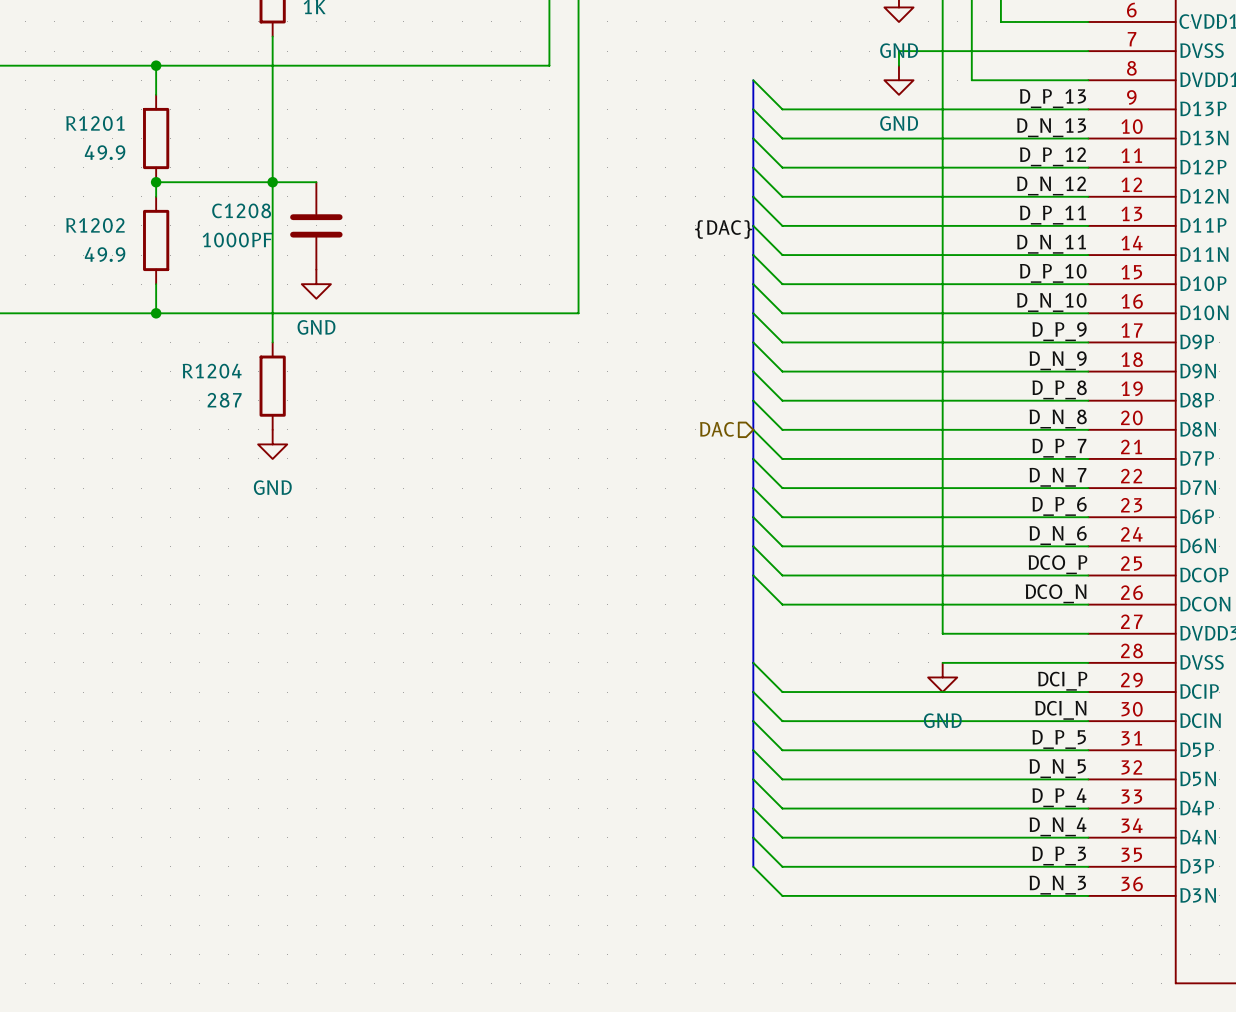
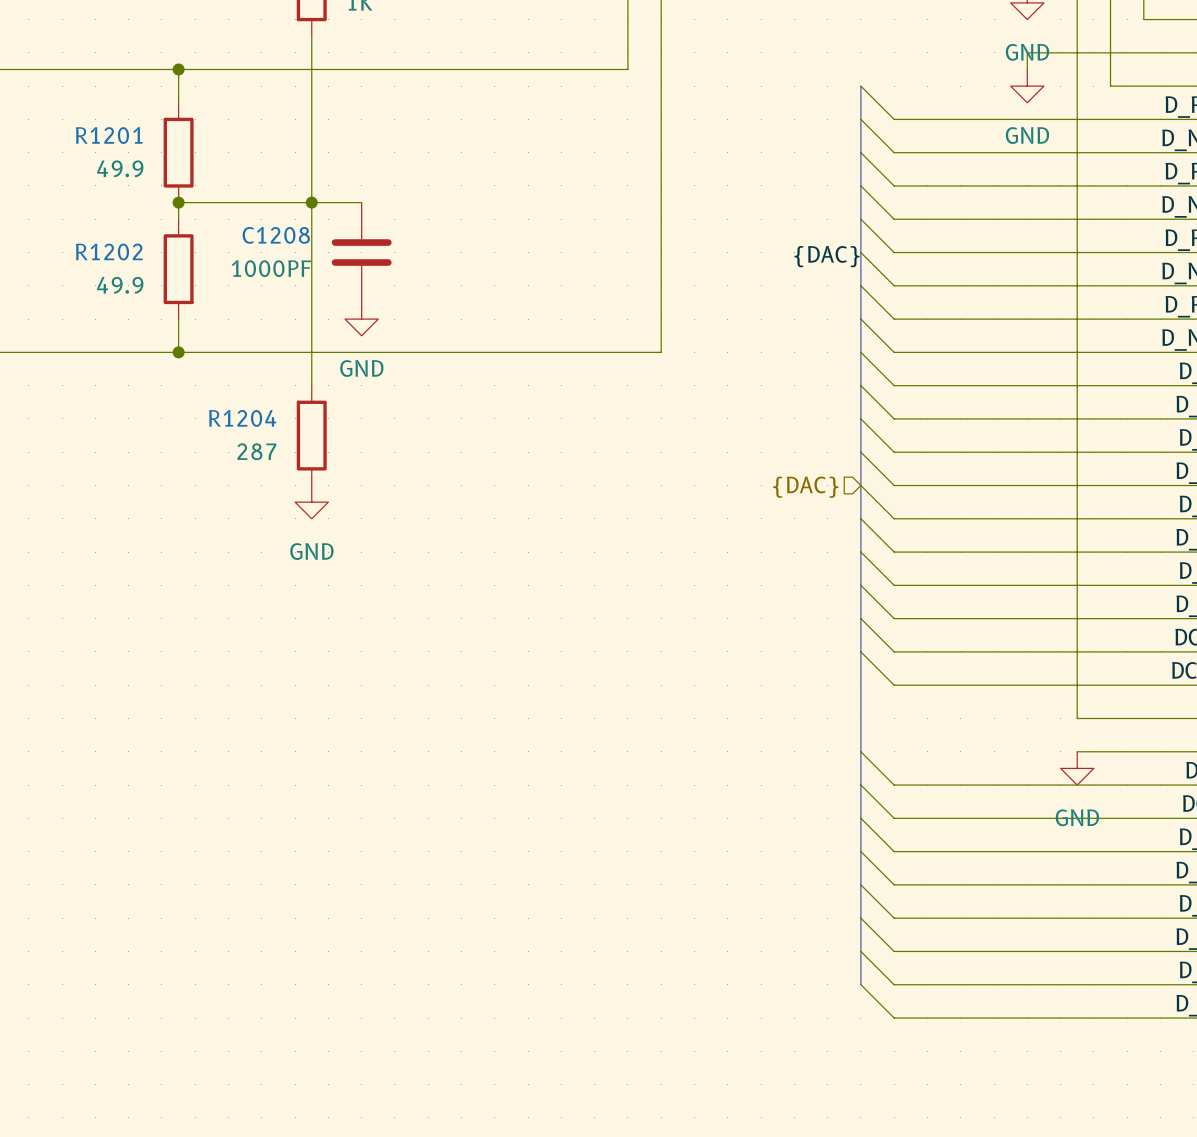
hierarchical label: DAC (717, 429) -> {DAC} (805, 487)

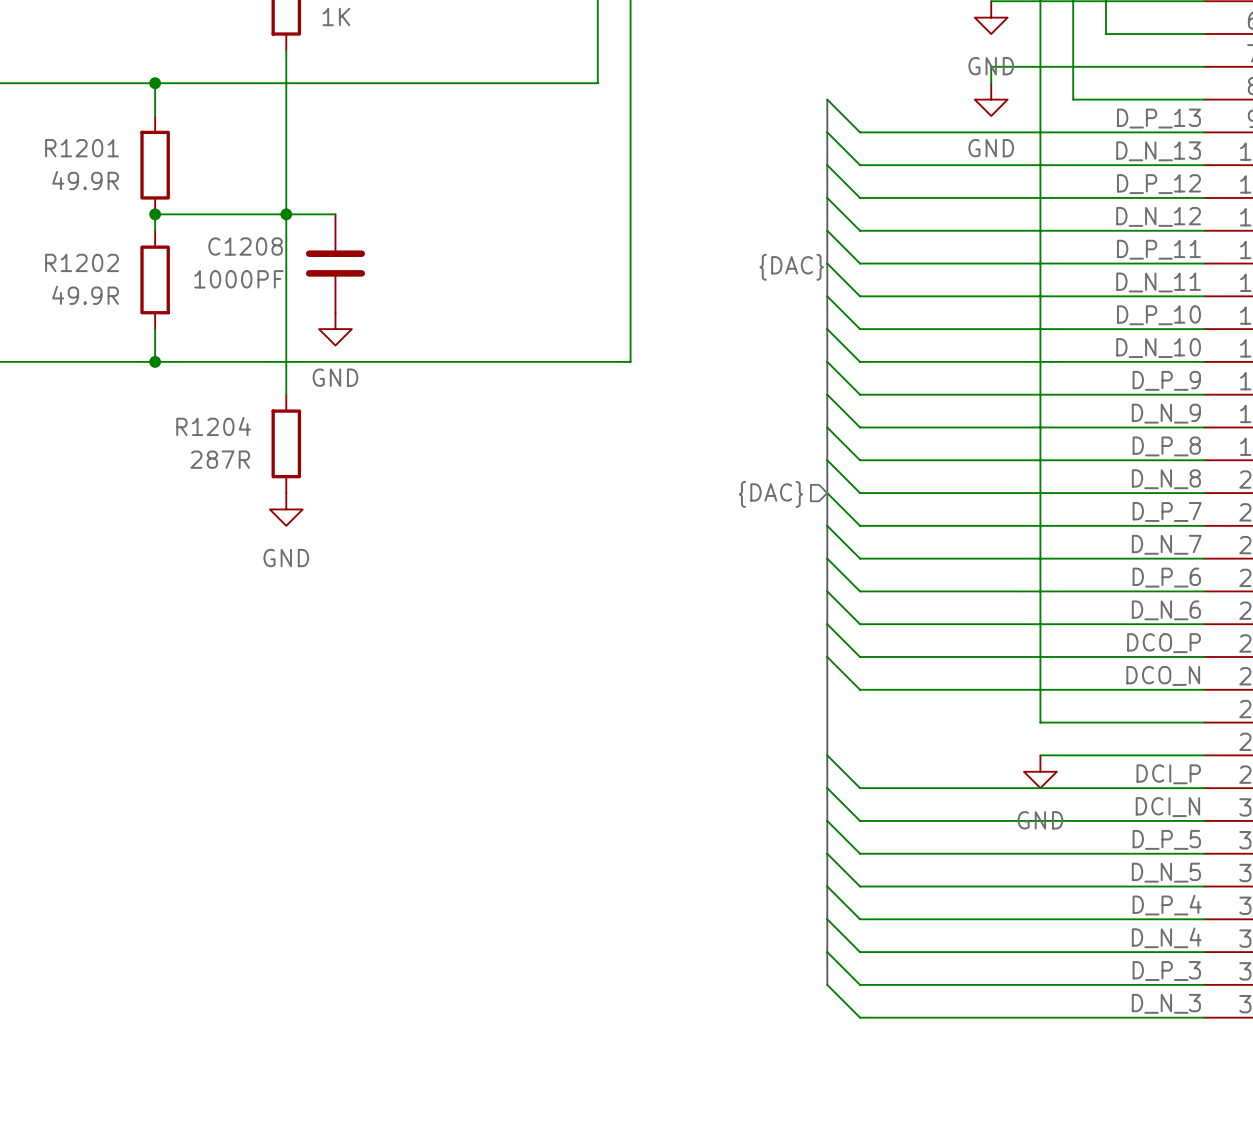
R1201 value: 49.9 (120, 168) -> 49.9R (85, 180)
R1202 value: 49.9 (120, 285) -> 49.9R (85, 295)
R1204 value: 287 (256, 451) -> 287R (220, 459)

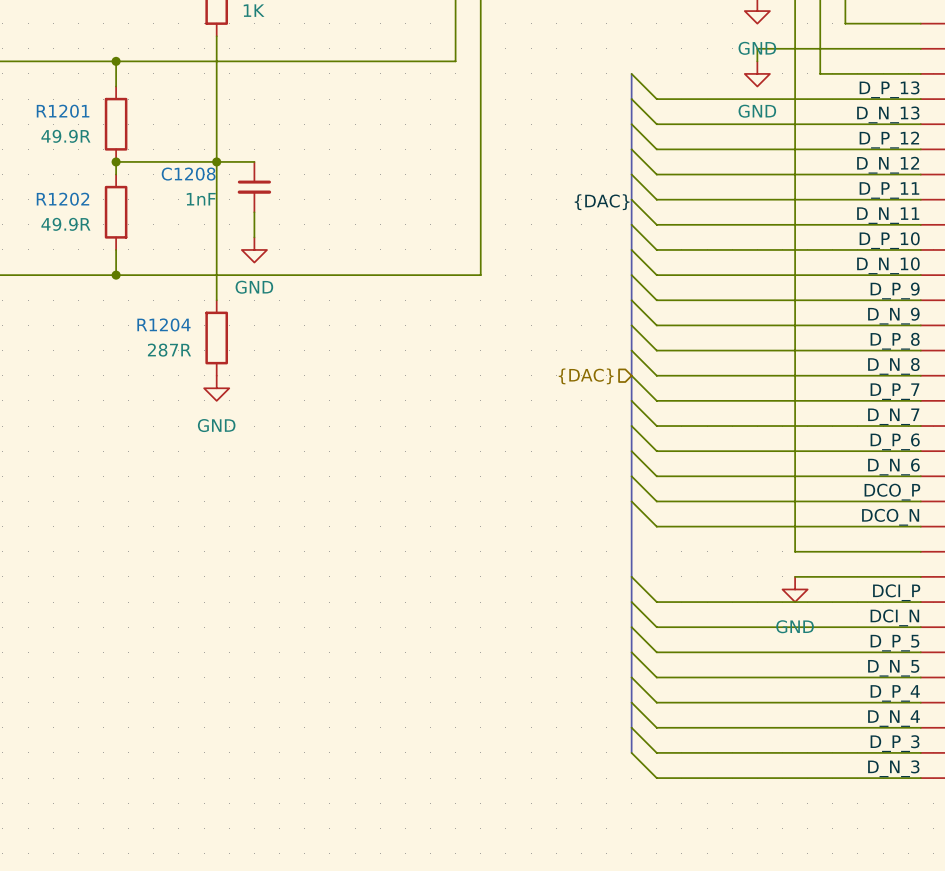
C1208 symbol: [305, 214, 365, 313] -> [237, 161, 272, 213]
C1208 value: 1000PF (238, 279) -> 1nF (201, 199)

